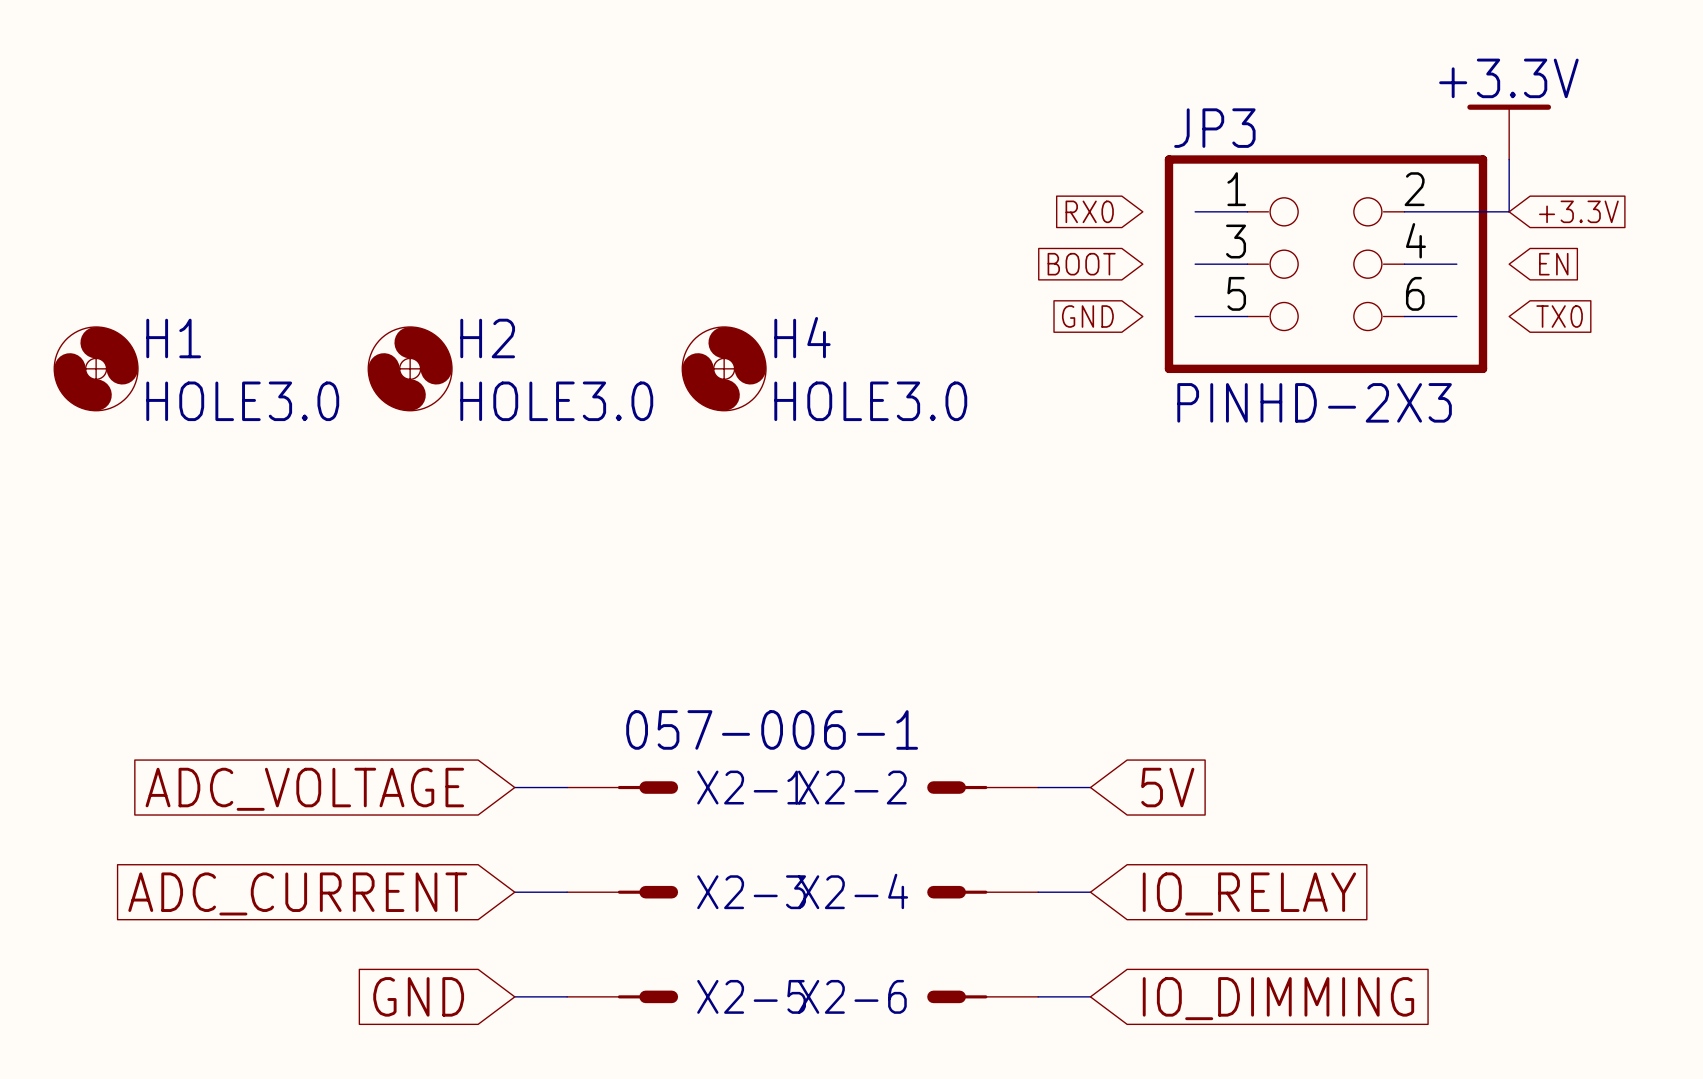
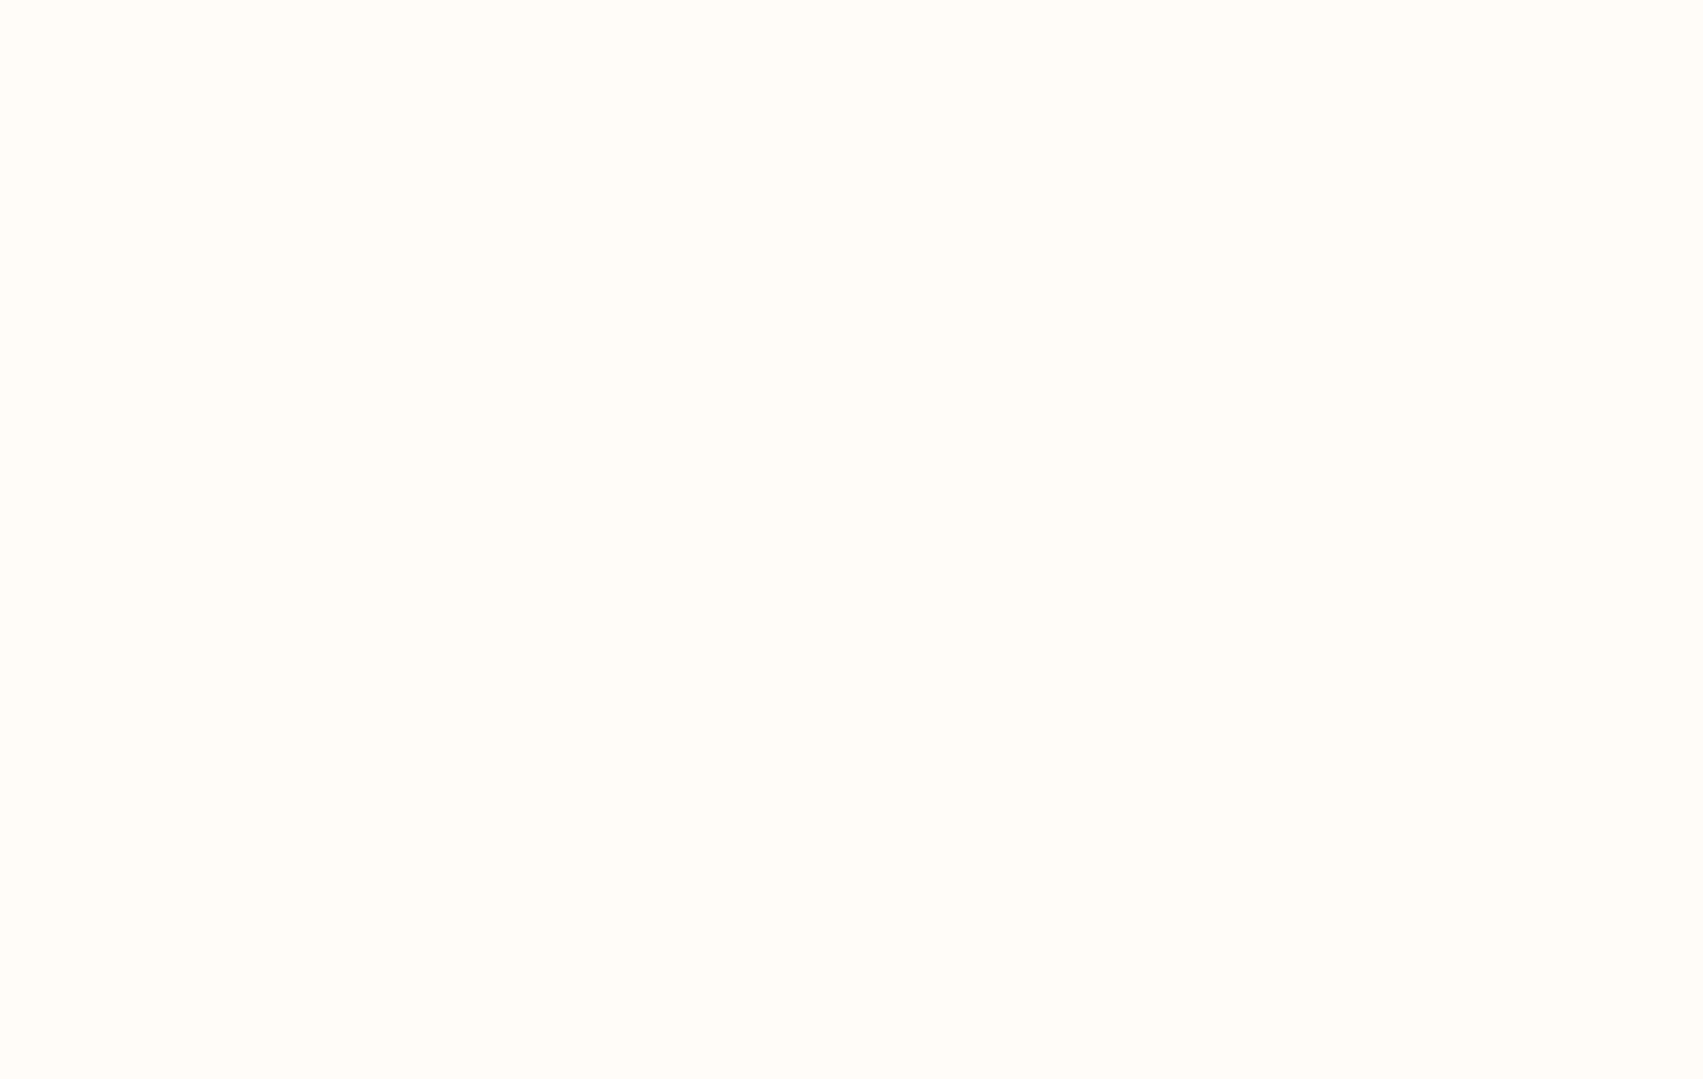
power symbol: +3.3V (1509, 132) -> none
wire: (1509, 159) (1509, 211) (1404, 211) -> none
global label: RX0 (1089, 211) -> none
wire: (1195, 211) (1247, 211) -> none
global label: +3.3V (1578, 211) -> none
global label: BOOT (1081, 264) -> none
wire: (1195, 264) (1247, 264) -> none
JP3: PINHD-2X3 (1325, 264) -> none
wire: (1404, 264) (1456, 264) -> none
global label: EN (1553, 264) -> none
global label: GND (1087, 316) -> none
wire: (1195, 316) (1247, 316) -> none
wire: (1404, 316) (1456, 316) -> none
global label: TX0 (1559, 316) -> none
H1: HOLE3.0 (96, 368) -> none
H2: HOLE3.0 (410, 368) -> none
H4: HOLE3.0 (724, 368) -> none
wire: (514, 787) (567, 787) -> none
X2-1: 057-006-1 (622, 787) -> none
X2-2: (982, 787) -> none
wire: (1038, 787) (1090, 787) -> none
global label: 5V (1167, 787) -> none
global label: ADC_VOLTAGE (304, 789) -> none
wire: (514, 892) (567, 892) -> none
X2-3: (622, 892) -> none
X2-4: (982, 892) -> none
wire: (1038, 892) (1090, 892) -> none
global label: ADC_CURRENT (297, 893) -> none
global label: IO_RELAY (1249, 893) -> none
global label: GND (418, 996) -> none
wire: (514, 996) (567, 996) -> none
X2-5: (622, 996) -> none
X2-6: (982, 996) -> none
wire: (1038, 996) (1090, 996) -> none
global label: IO_DIMMING (1278, 998) -> none

